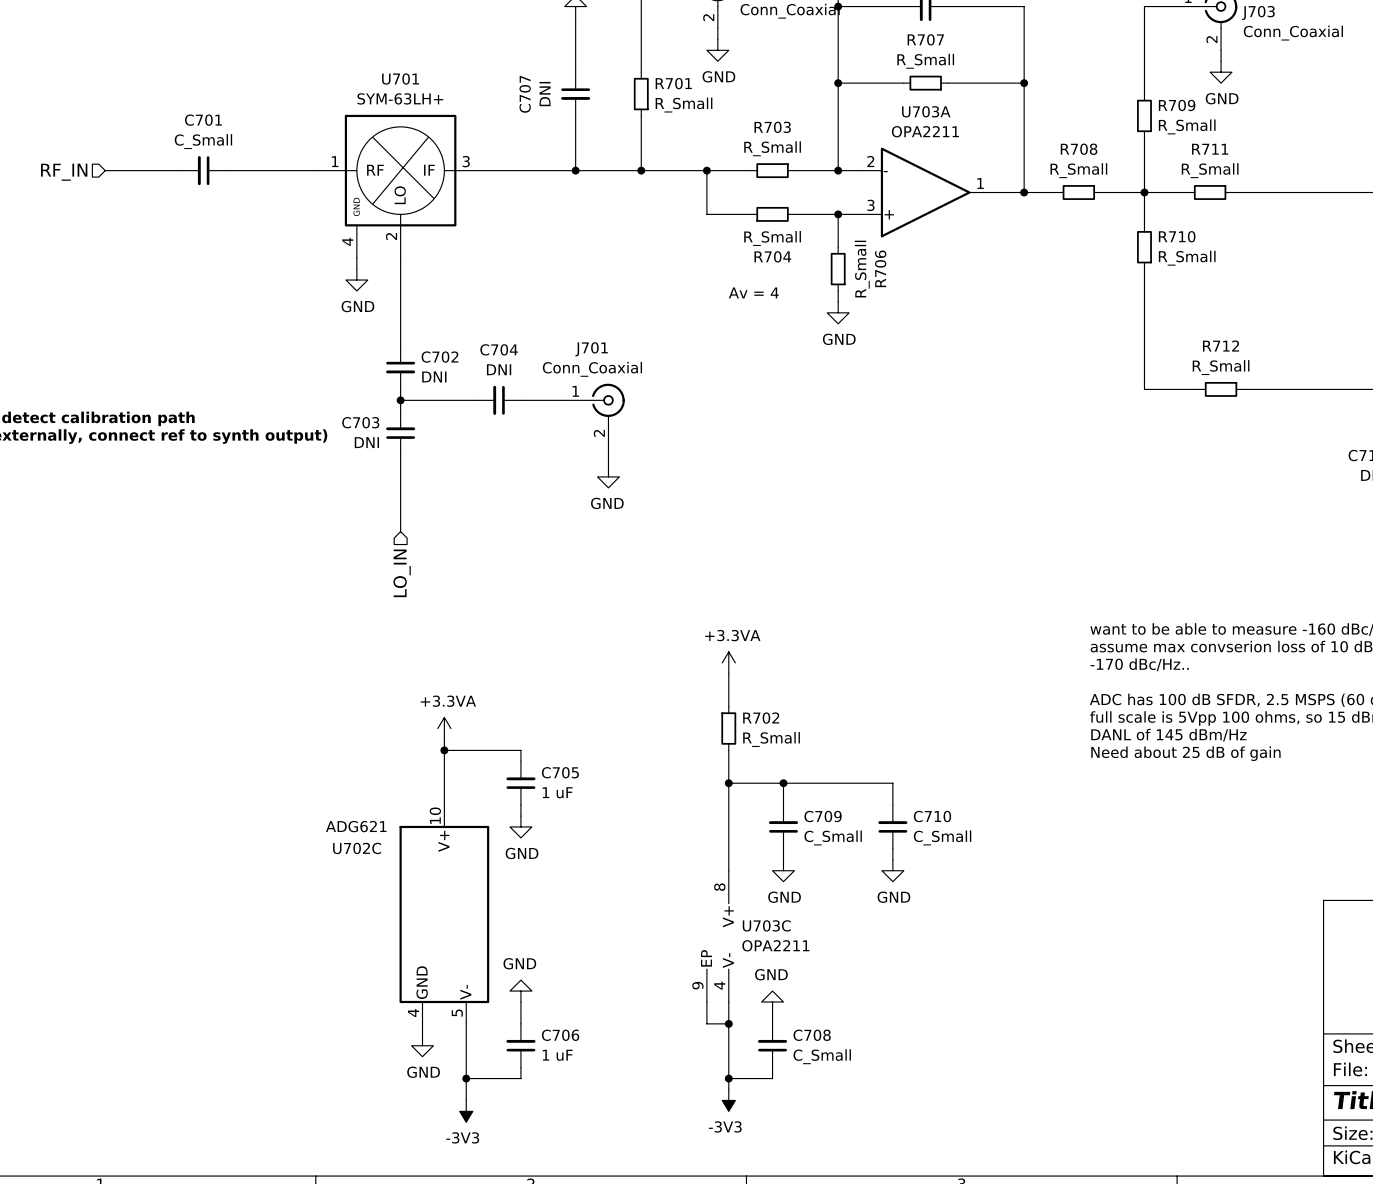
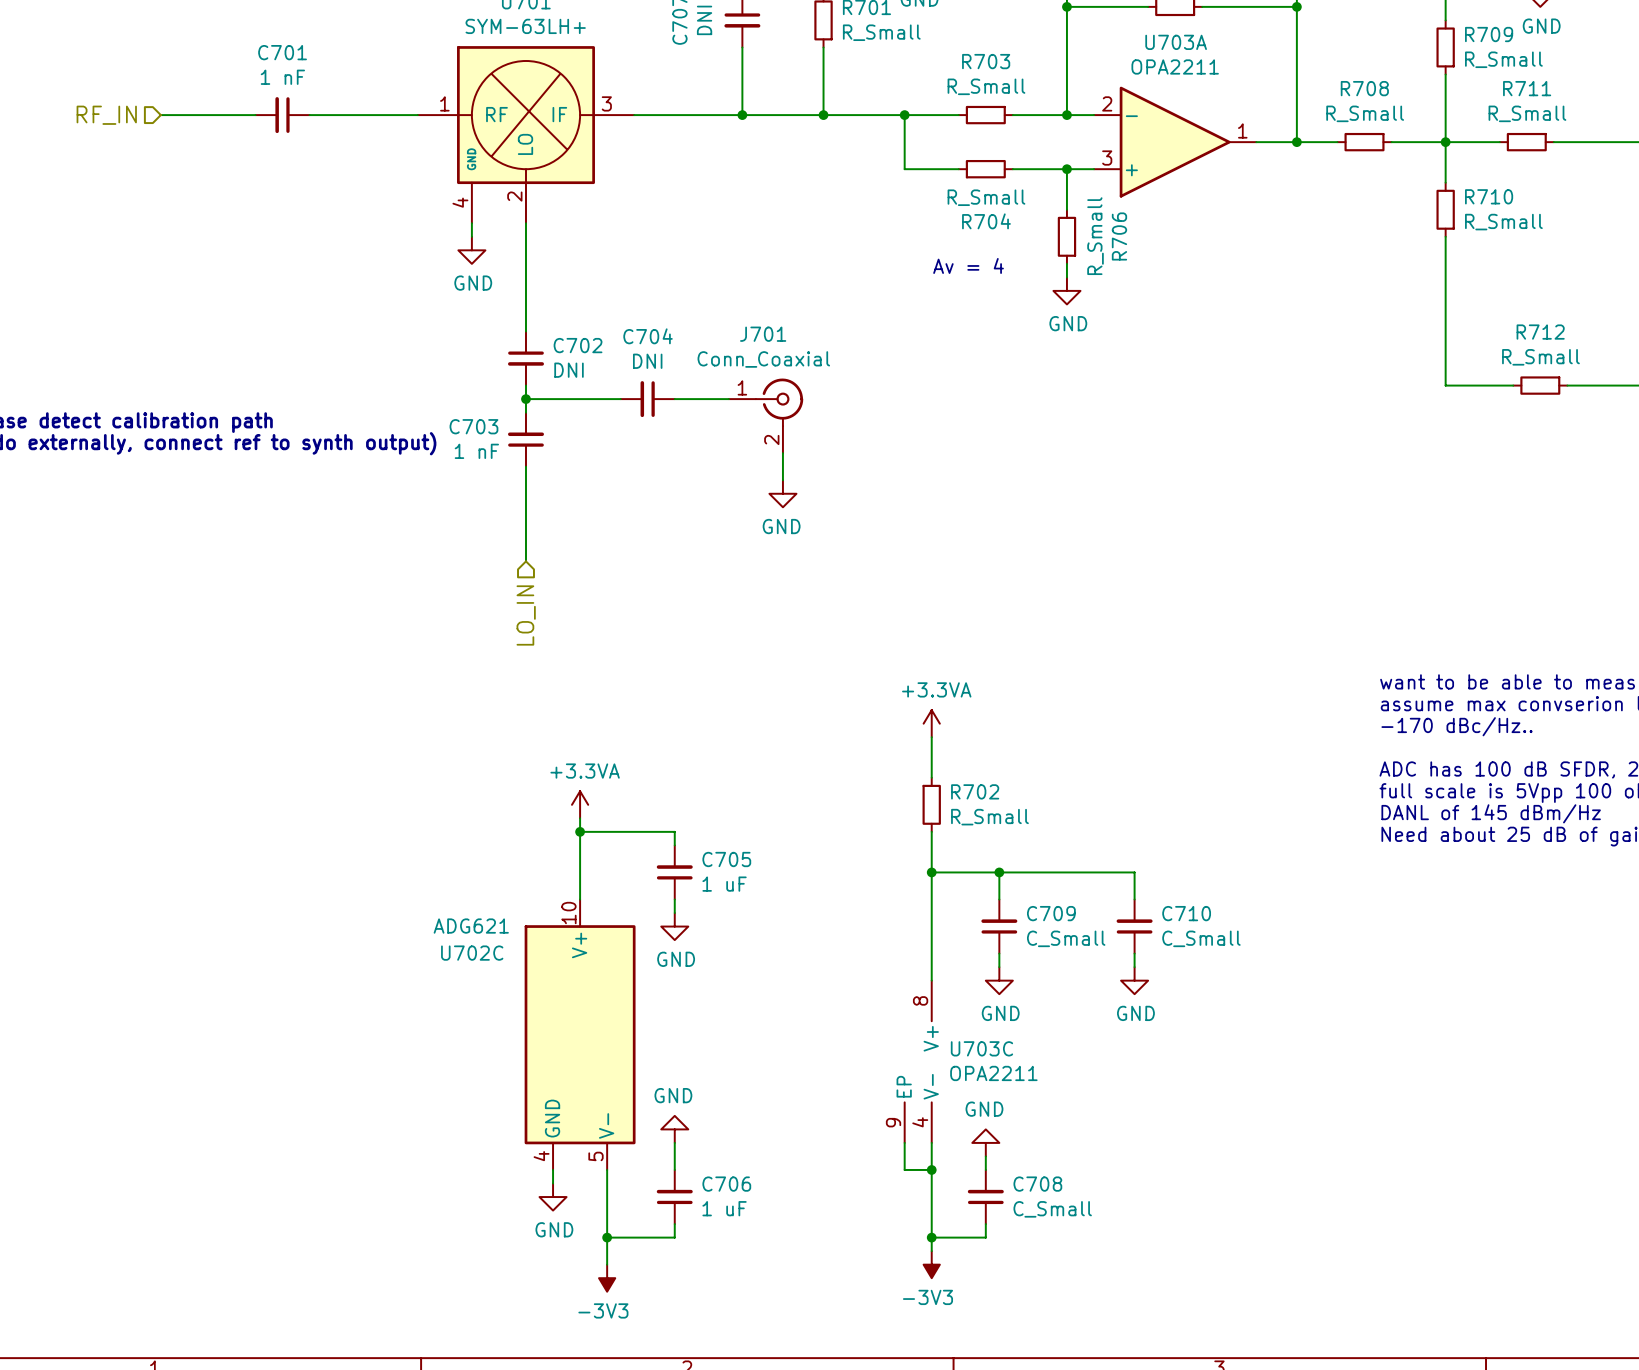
C701 value: C_Small (203, 141) -> 1 nF (282, 77)
C703 value: DNI (366, 442) -> 1 nF (476, 451)

